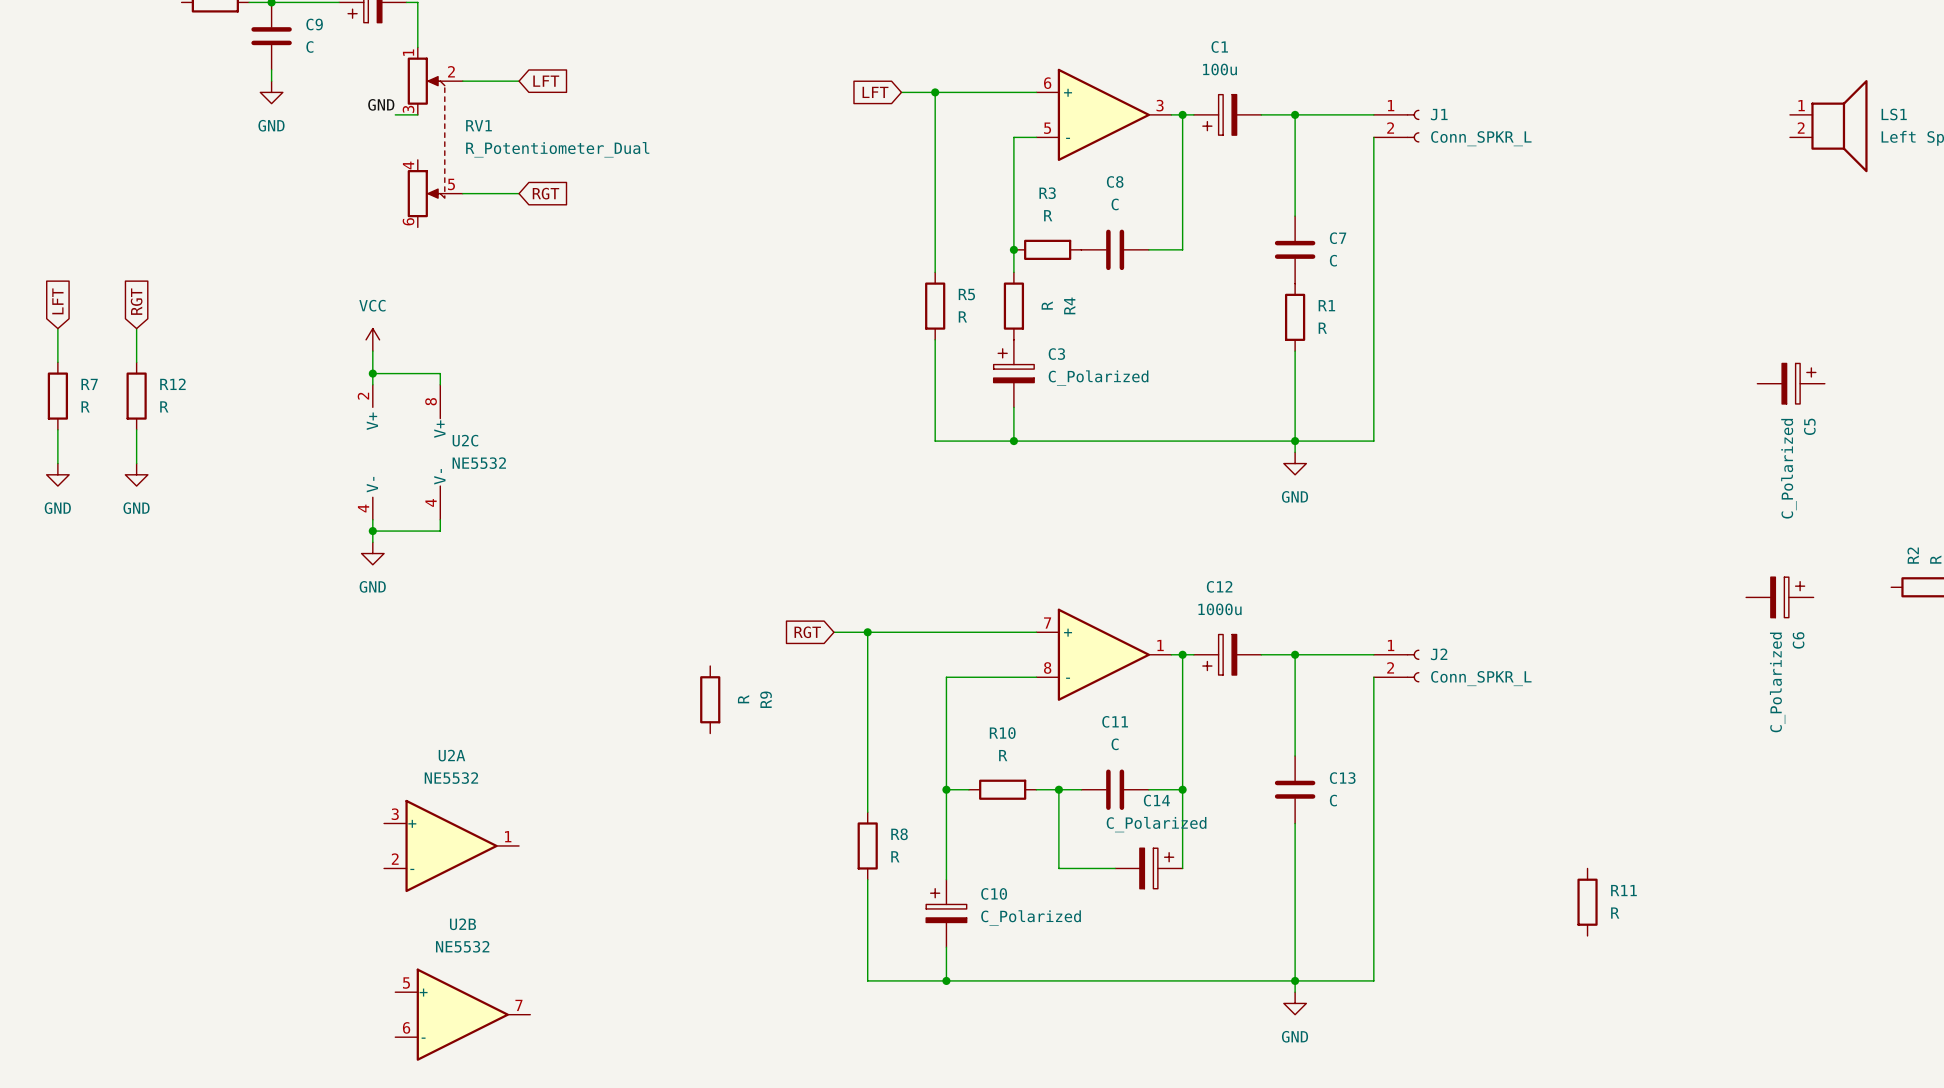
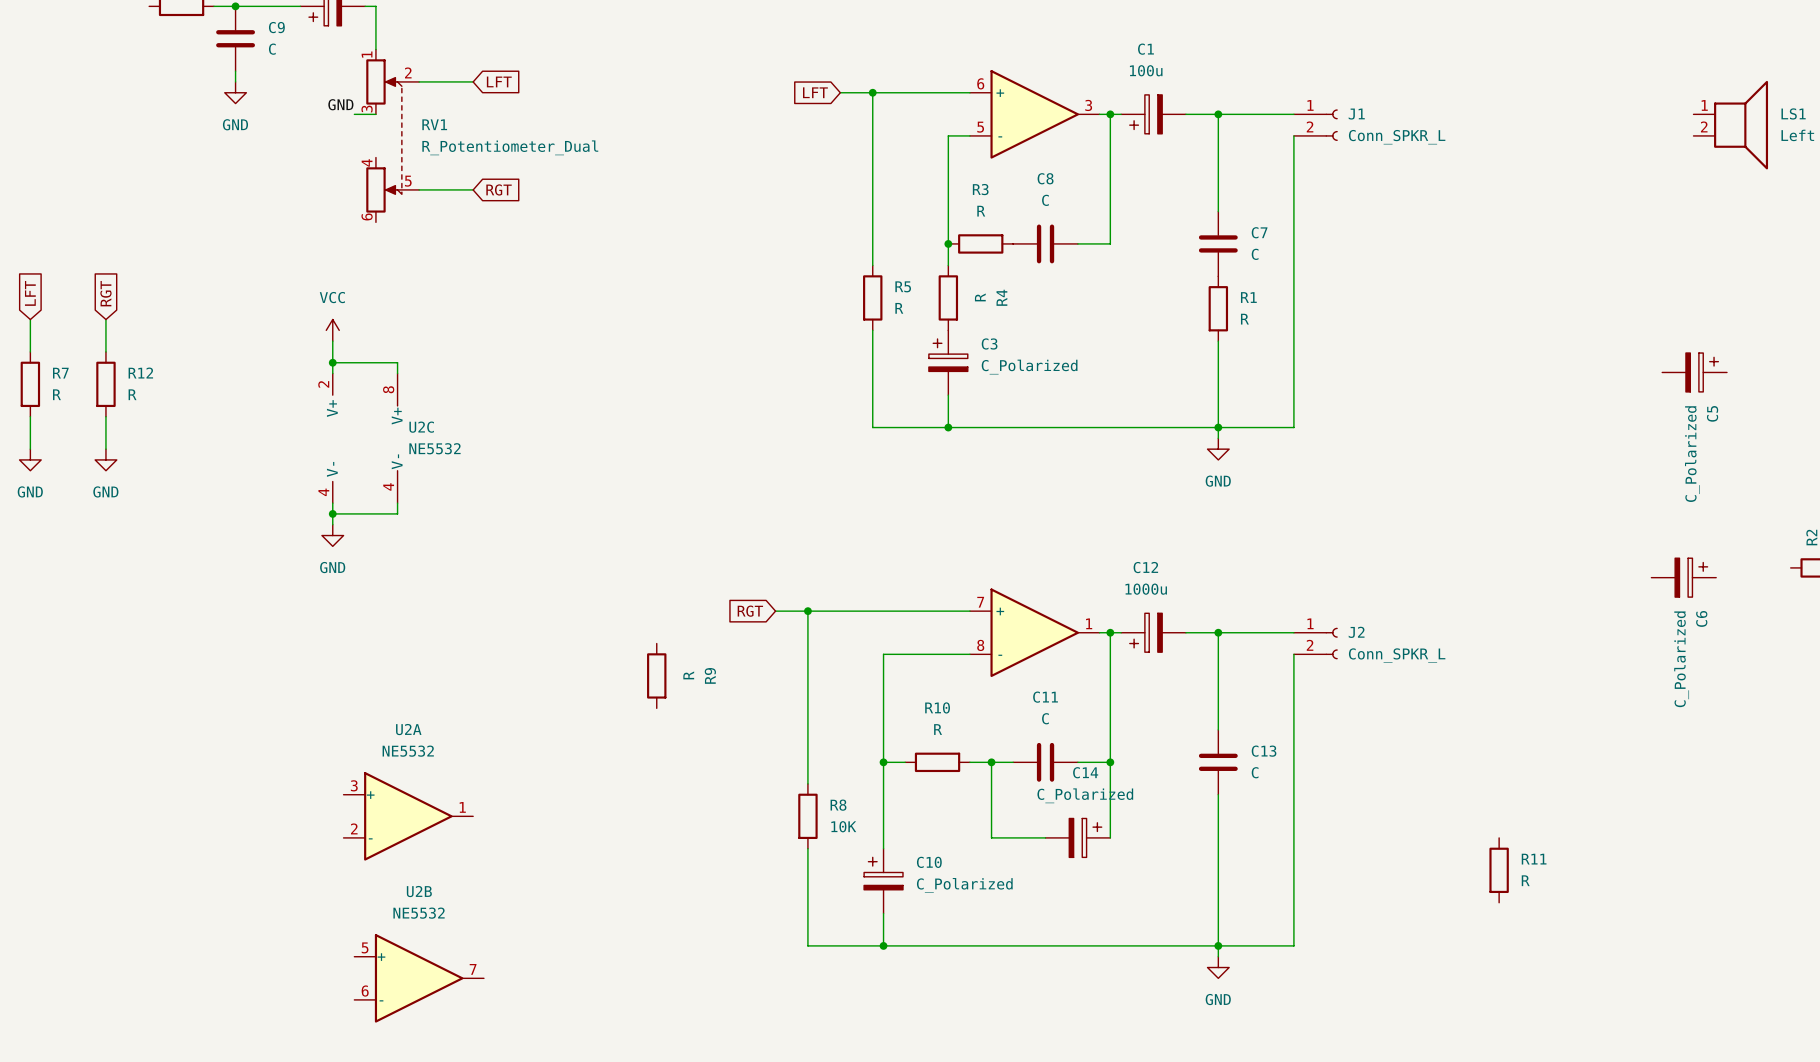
R8 value: R (895, 856) -> 10K (843, 826)

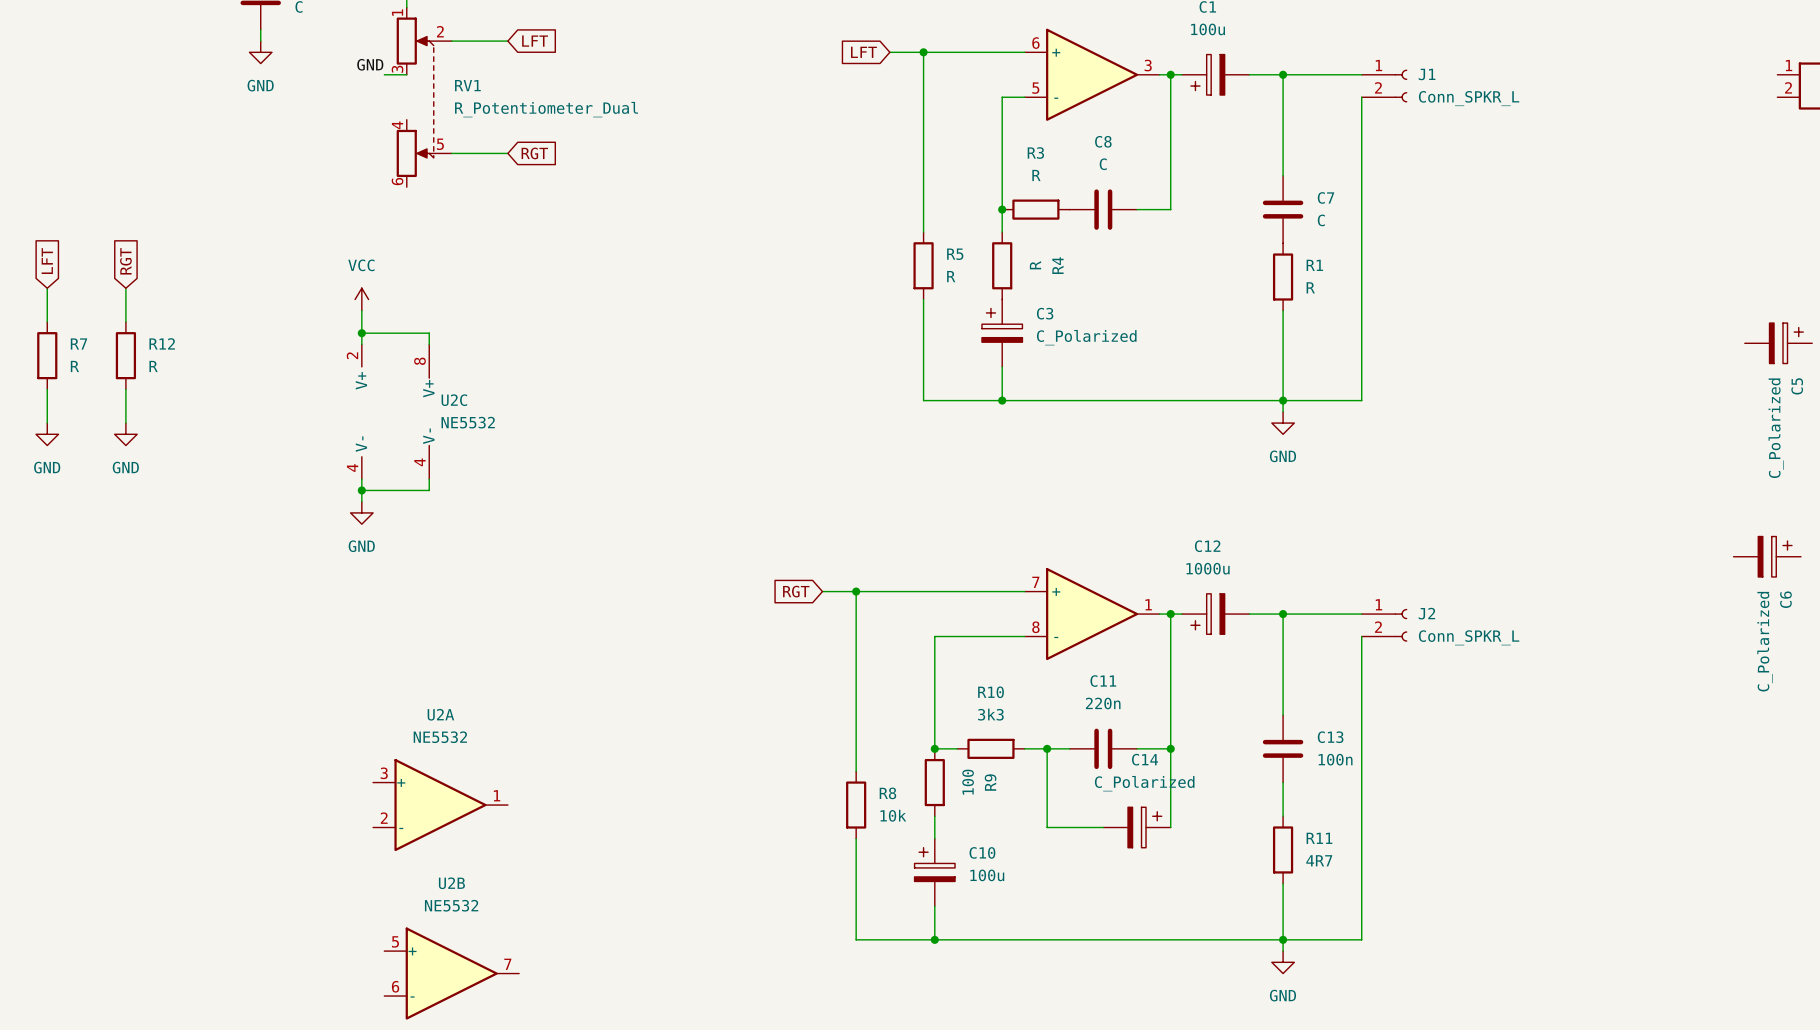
R9 position: (656, 675) -> (934, 782)
R9 value: R (688, 675) -> 100 (968, 782)
C11 value: C (1045, 718) -> 220n (1103, 703)
R10 value: R (938, 729) -> 3k3 (990, 714)
wire: (883, 762) (883, 827) -> none
C13 value: C (1255, 772) -> 100n (1335, 759)
R8 value: 10K (843, 826) -> 10k (893, 815)
wire: (1218, 827) (1218, 891) -> none
R11 position: (1499, 870) -> (1283, 849)
R11 value: R (1525, 880) -> 4R7 (1319, 860)
C10 value: C_Polarized (964, 885) -> 100u (987, 875)

